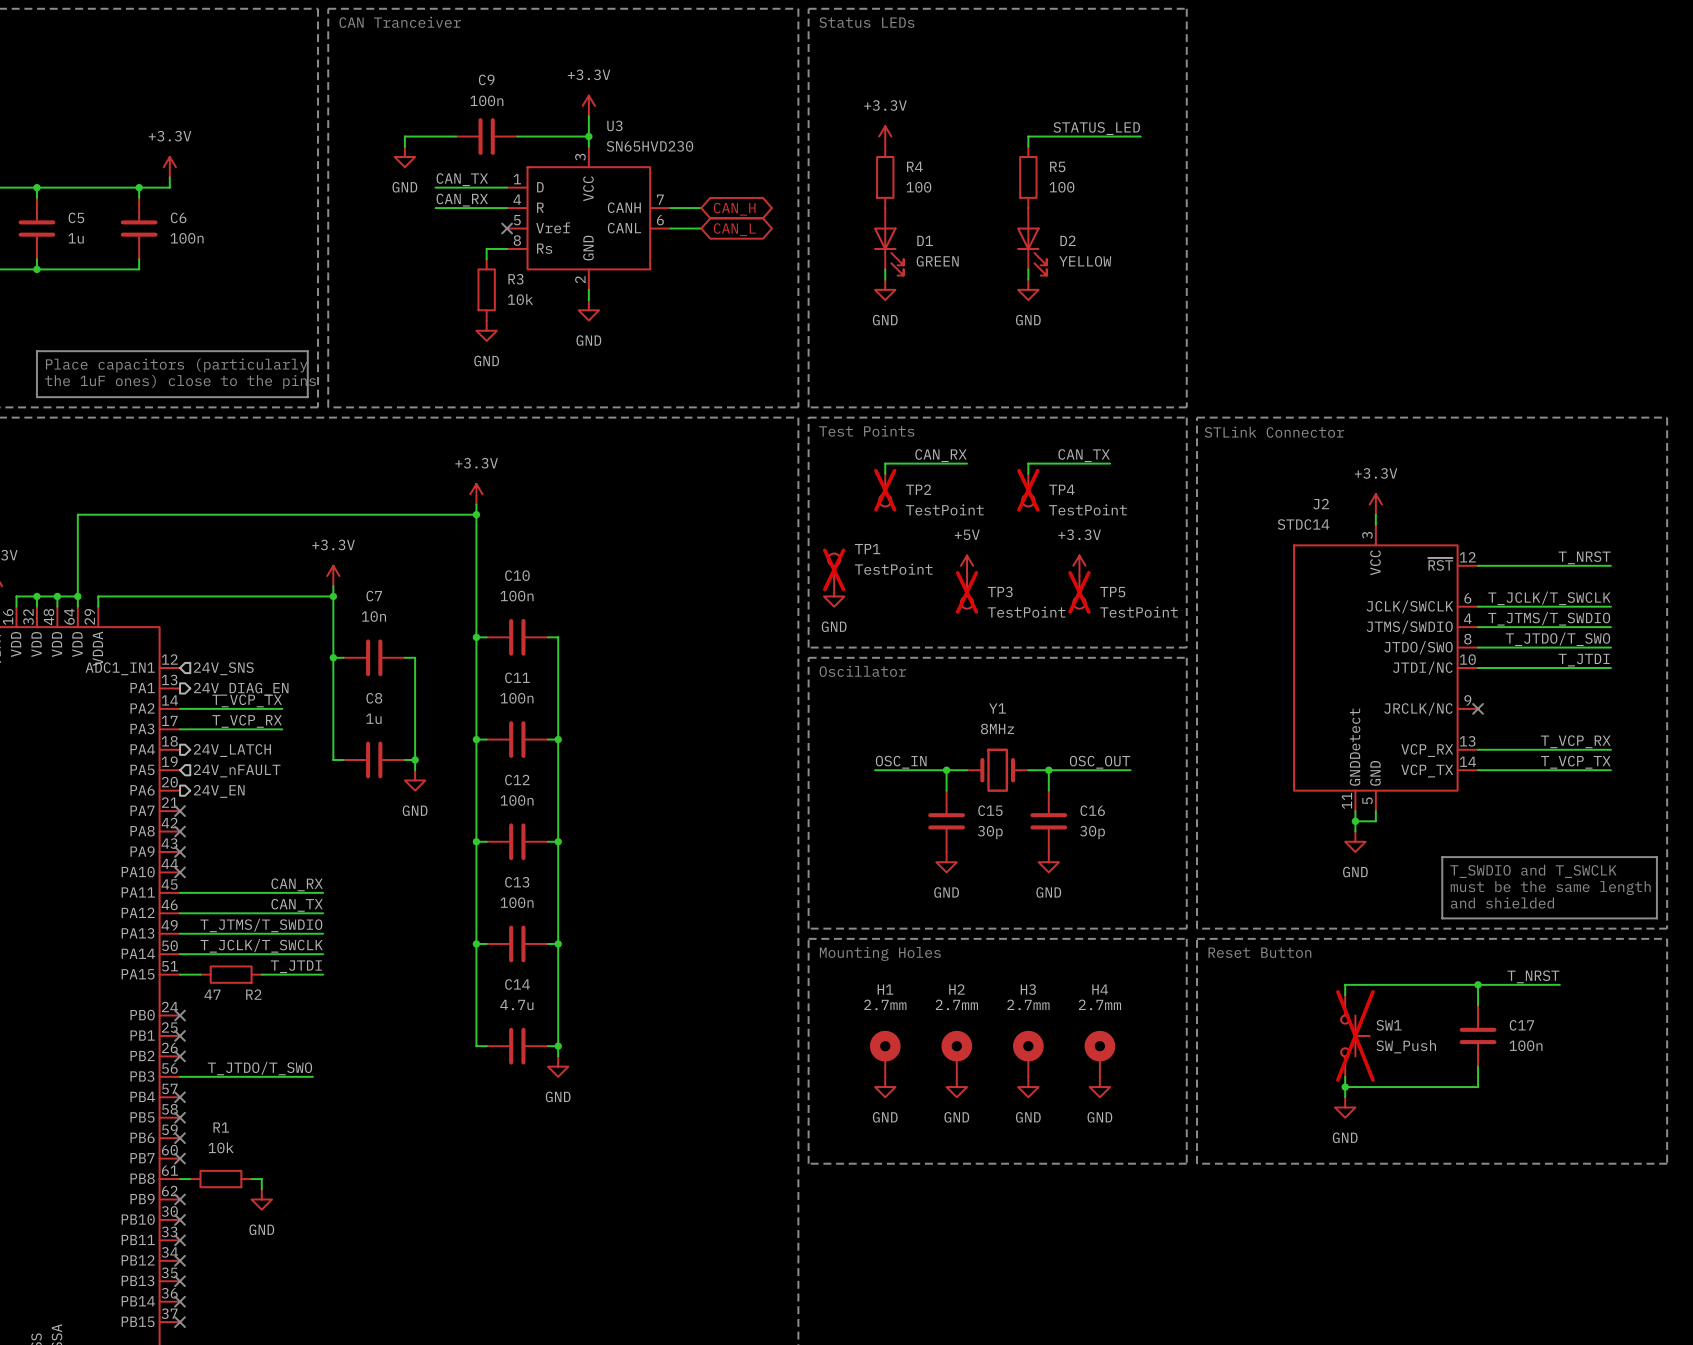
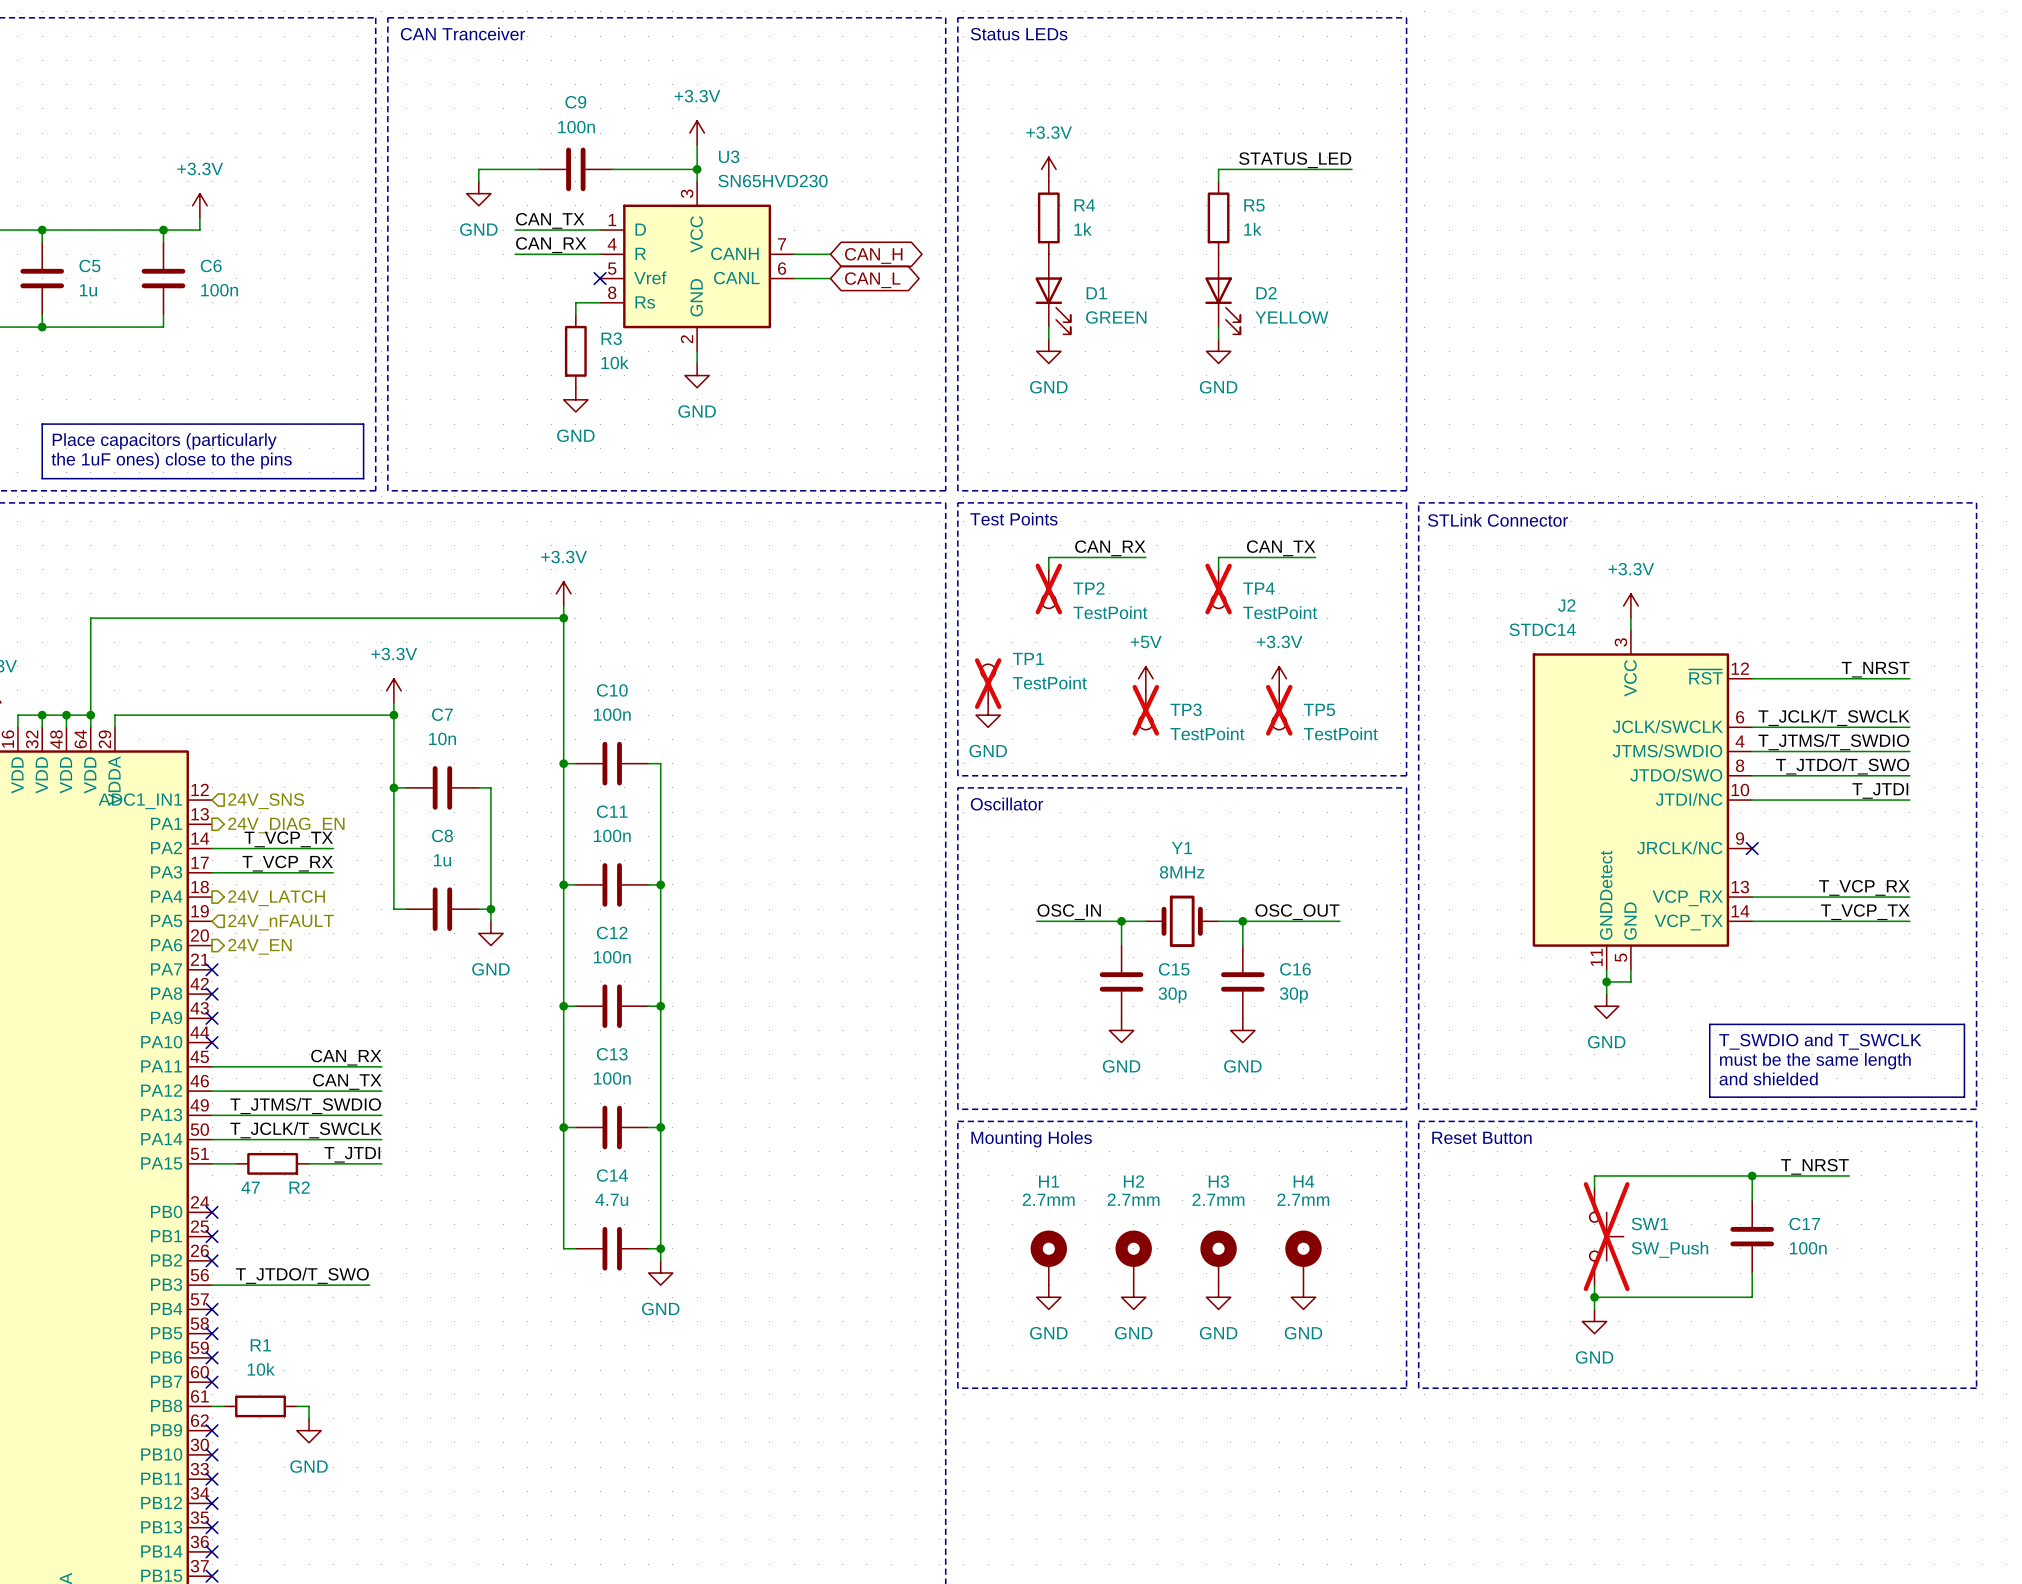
R4 value: 100 (918, 187) -> 1k (1083, 229)
R5 value: 100 (1061, 187) -> 1k (1252, 229)

